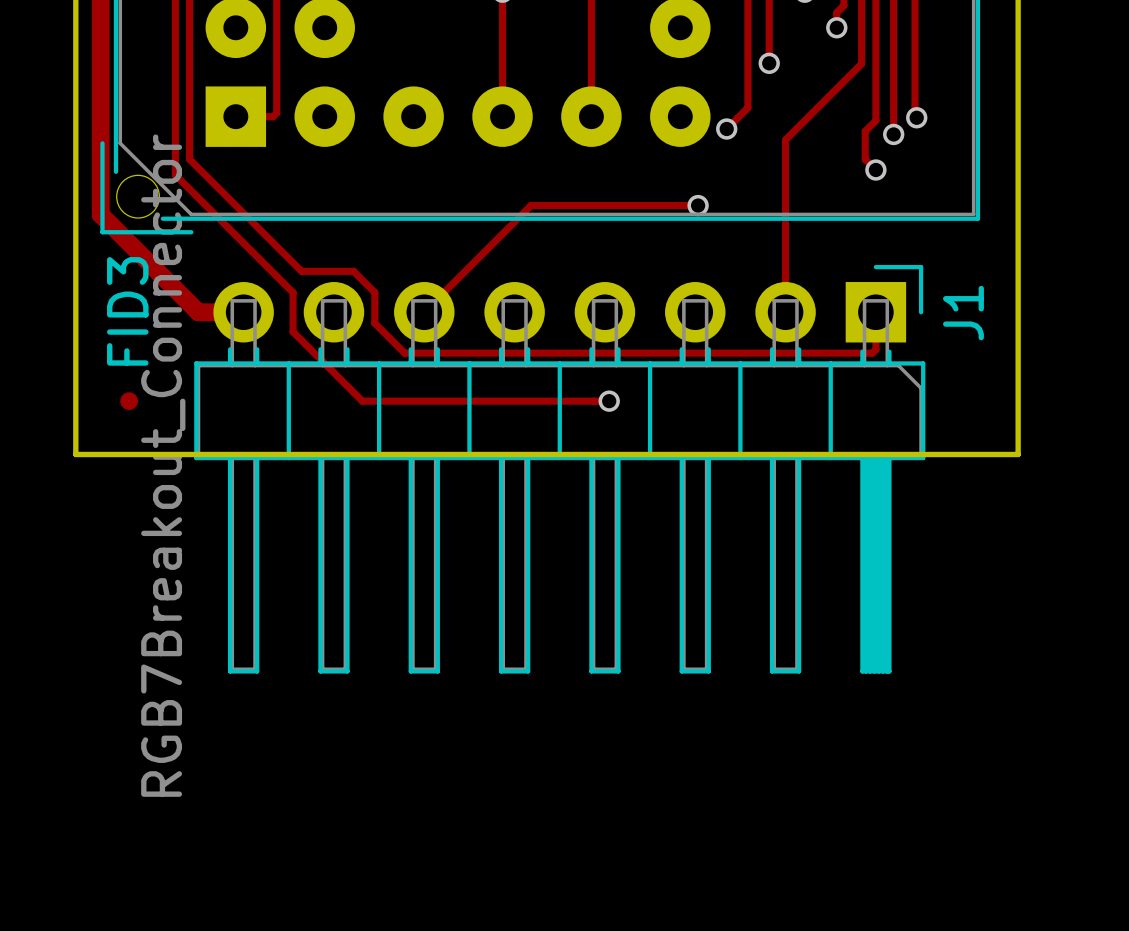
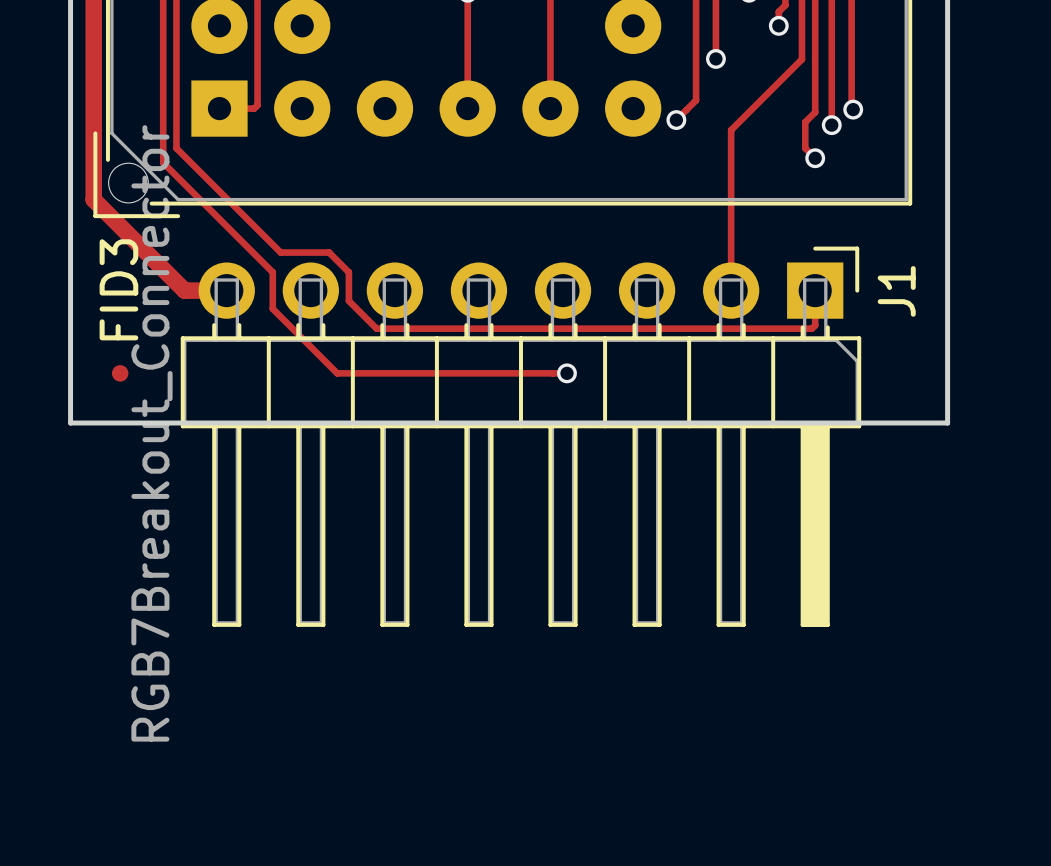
track: (698, 205) (530, 205) (424, 312) -> none
via: (698, 205) -> none

